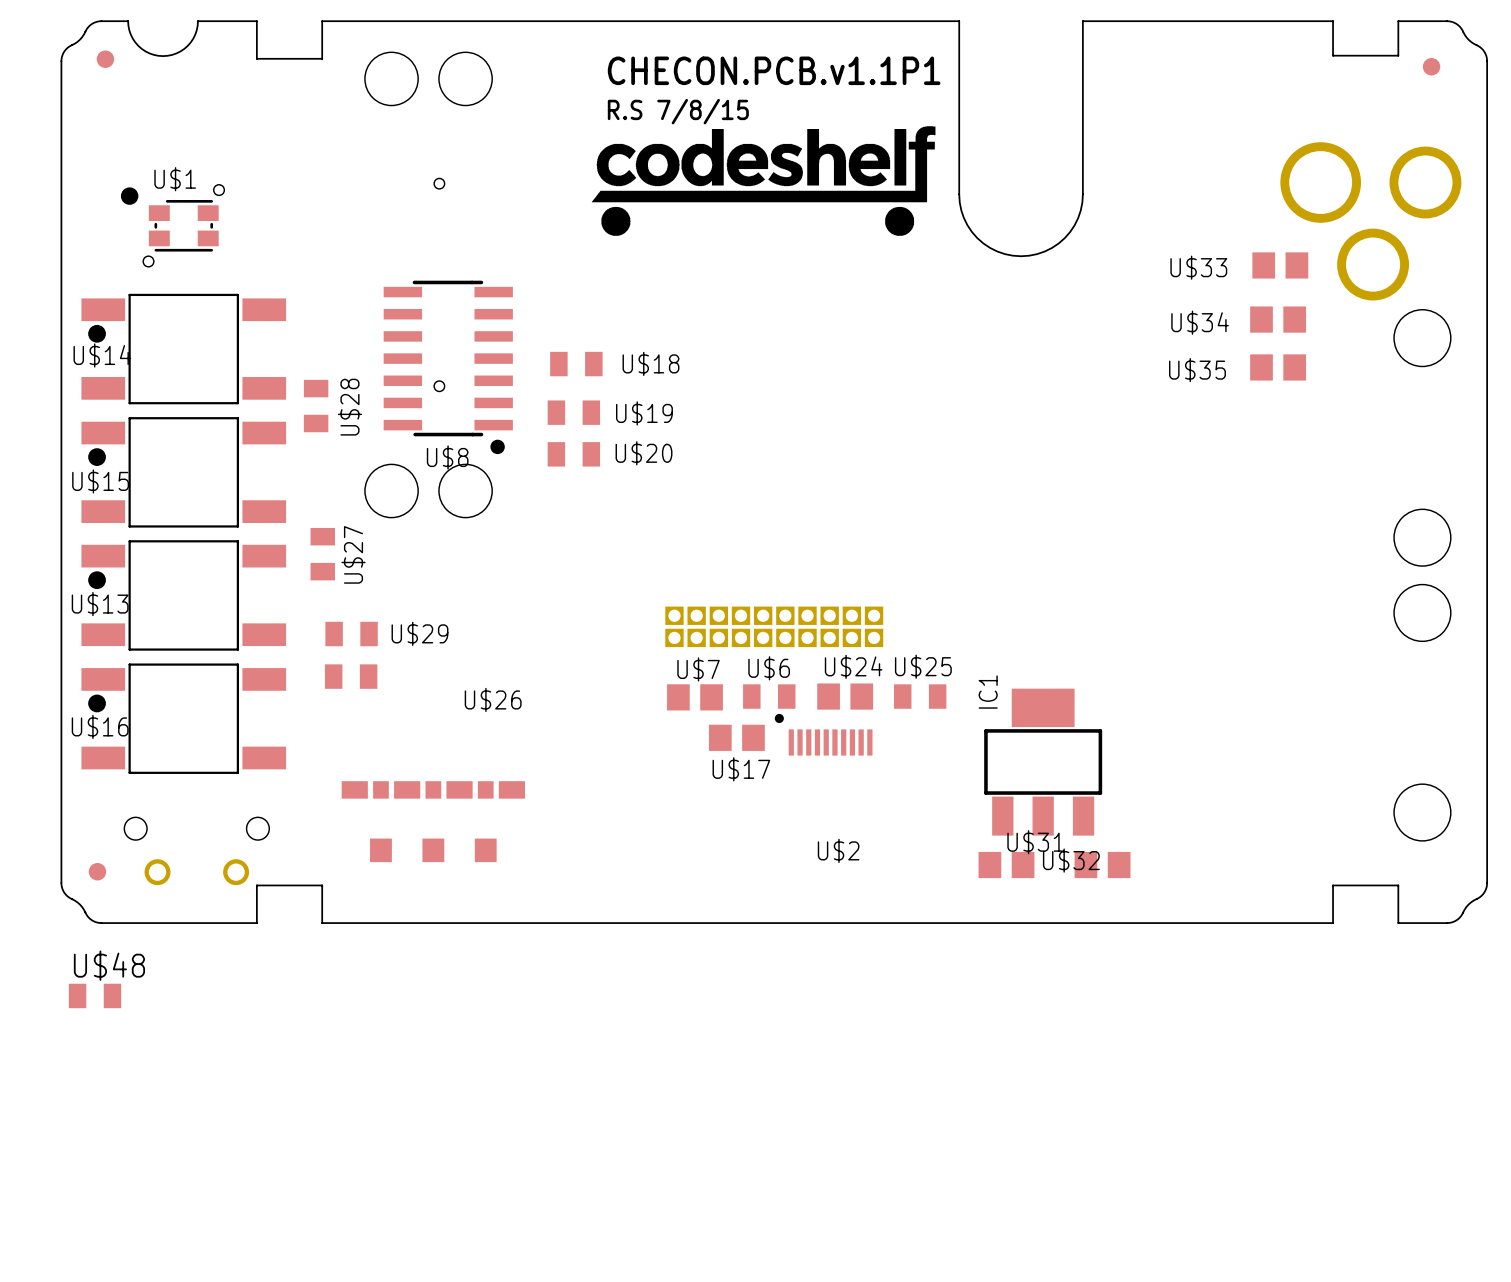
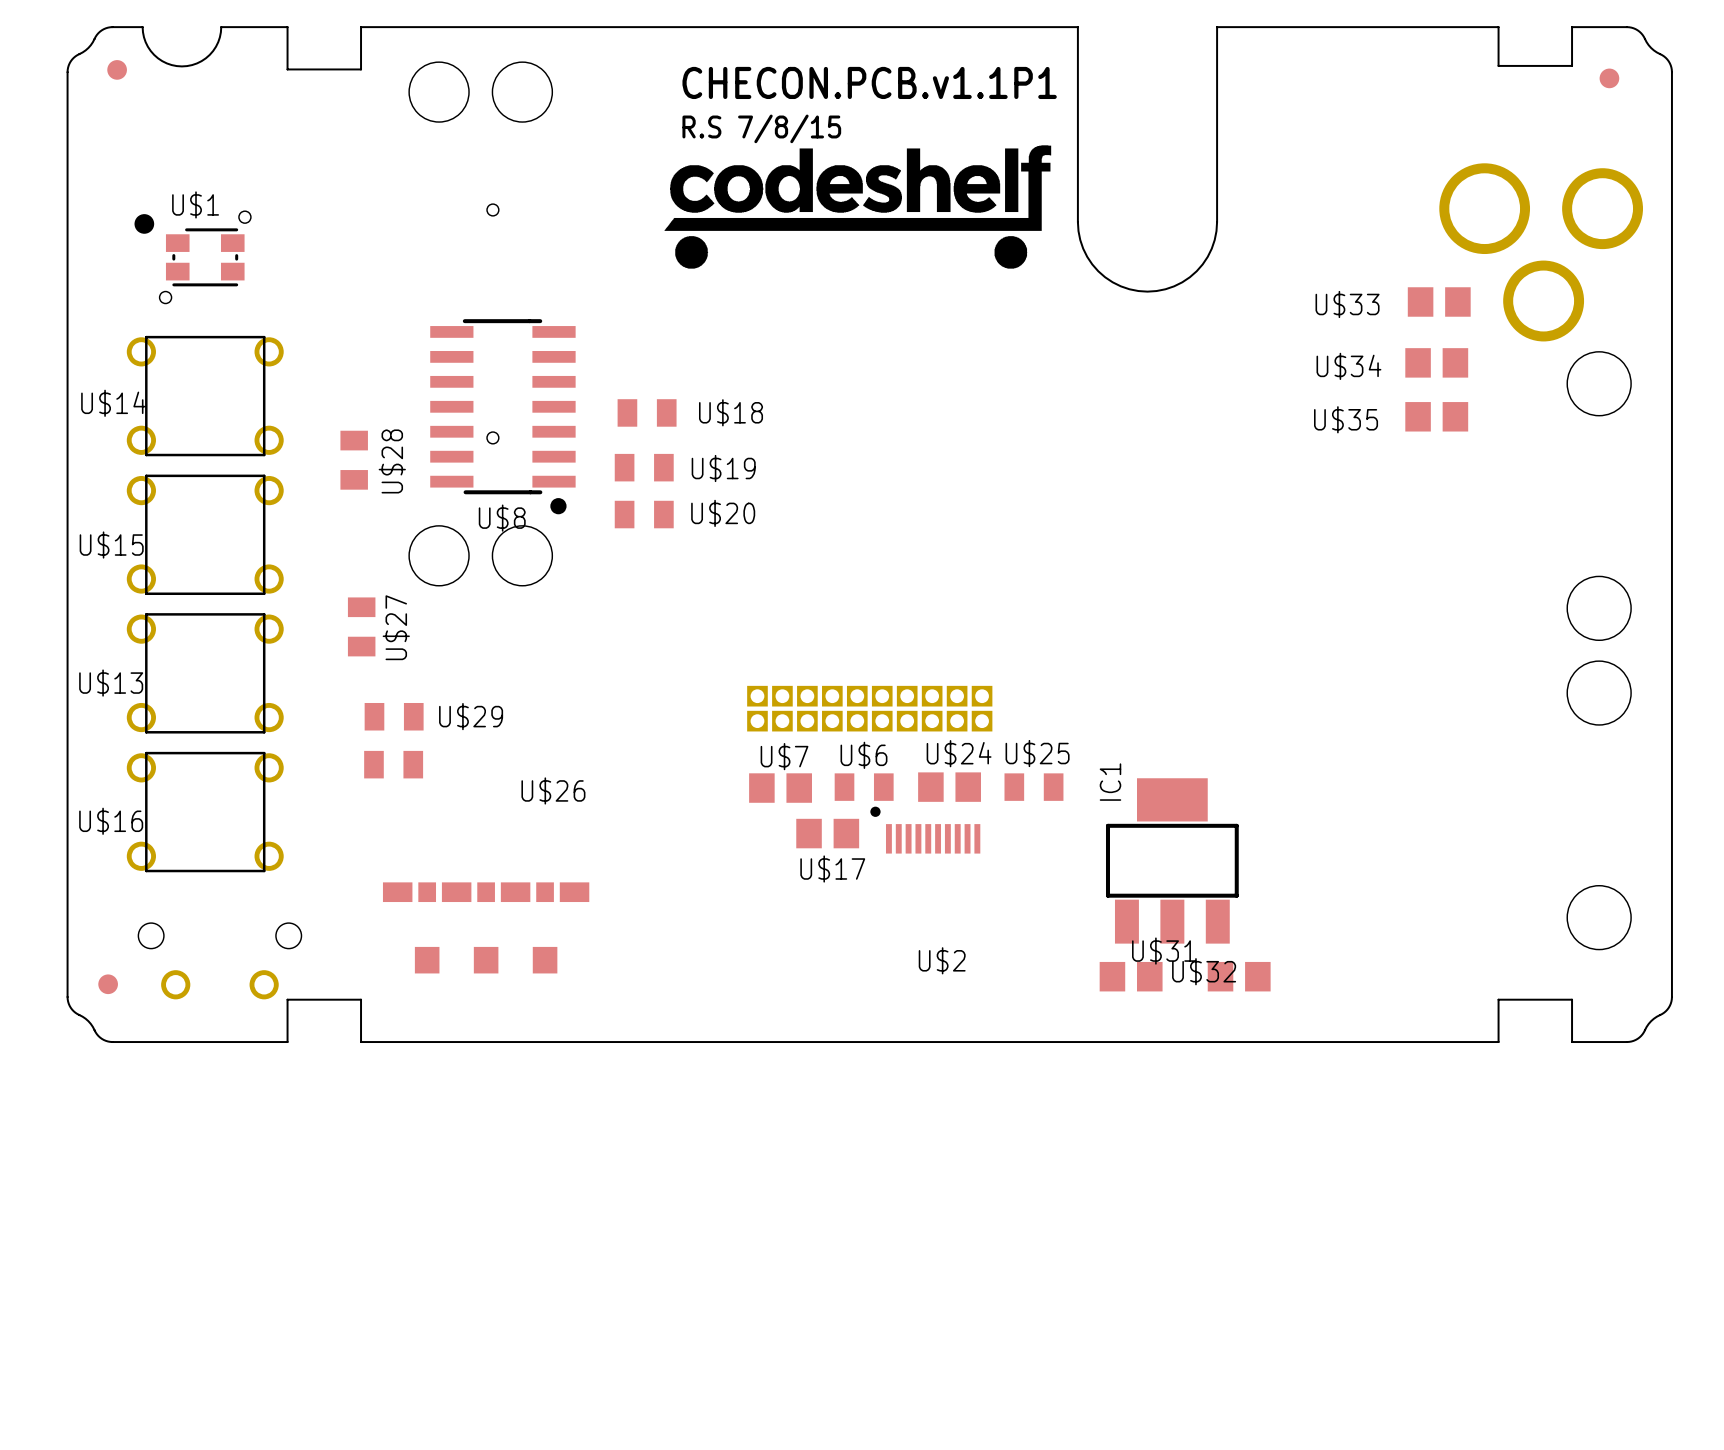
U$14 footprint: [81, 293, 287, 405] -> [126, 335, 284, 457]
U$15 footprint: [81, 417, 287, 528] -> [126, 474, 284, 596]
U$13 footprint: [81, 540, 287, 651] -> [126, 613, 284, 734]
U$16 footprint: [81, 663, 287, 774] -> [126, 751, 284, 873]
U$48: (95, 995) -> none

